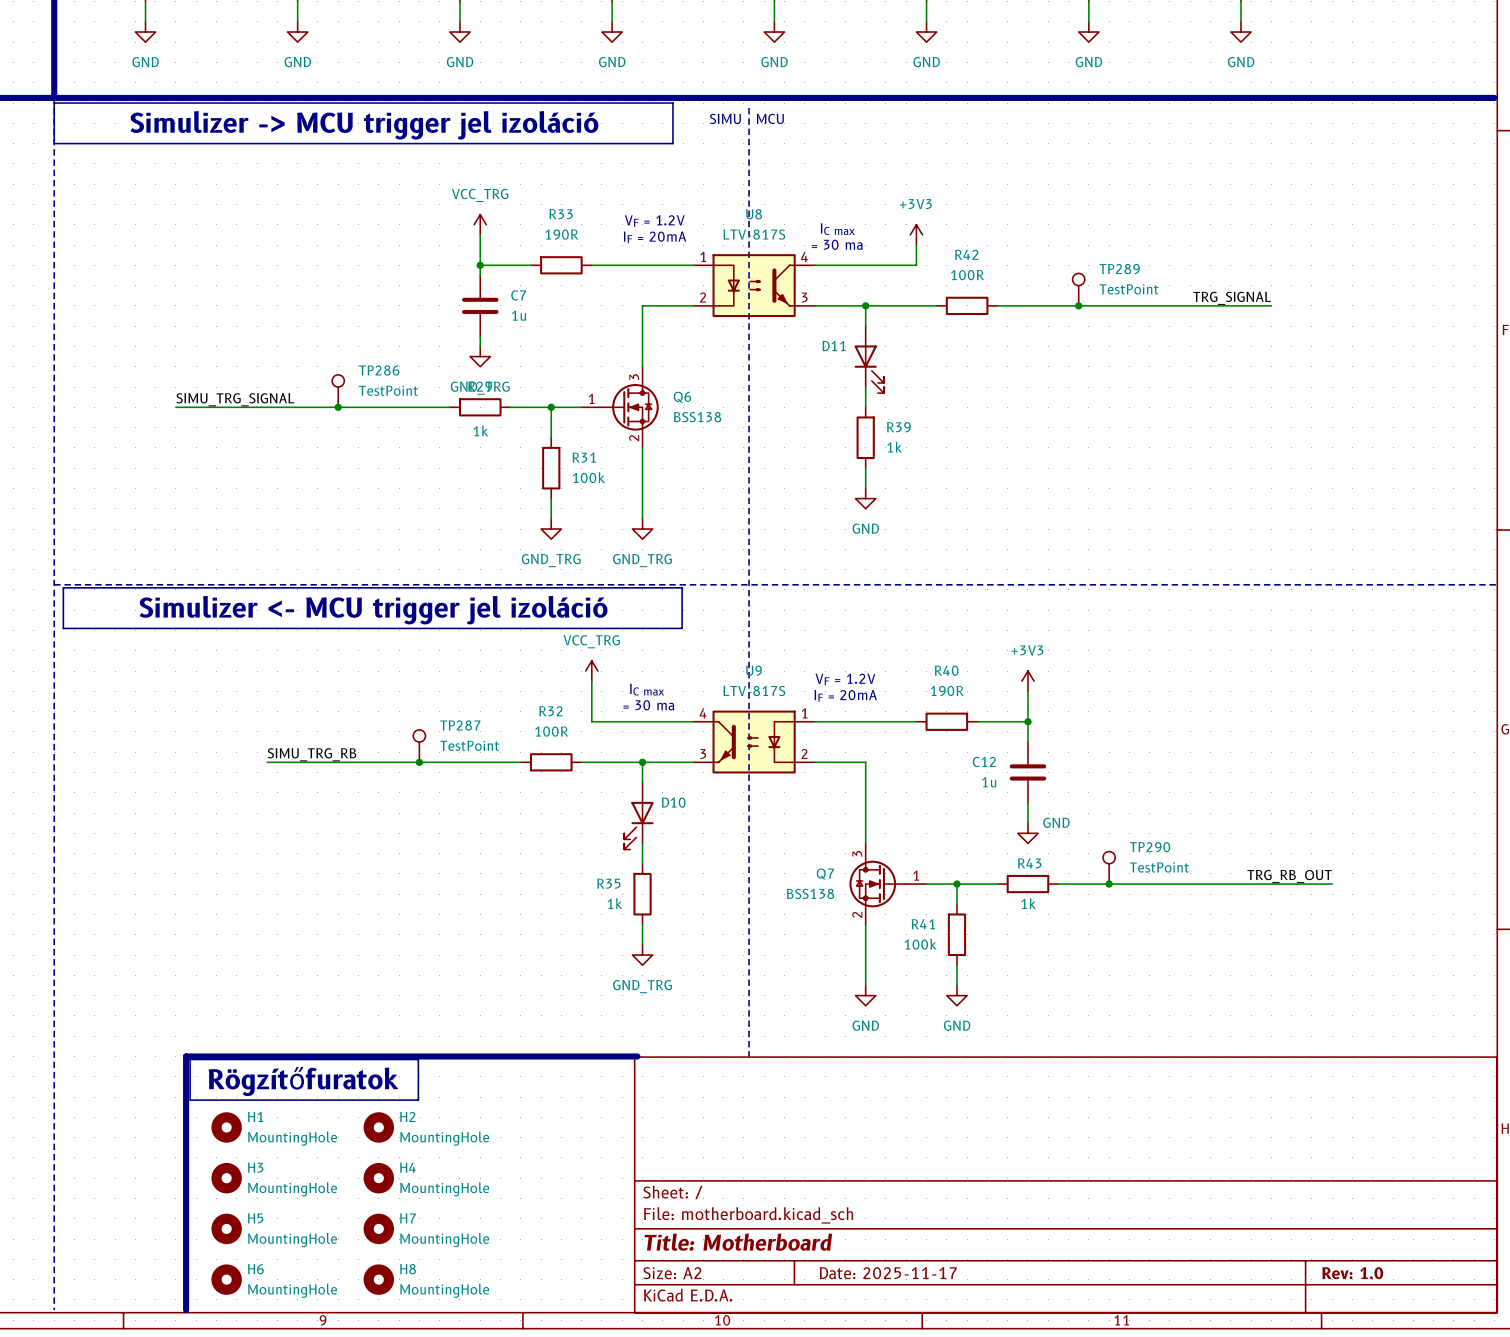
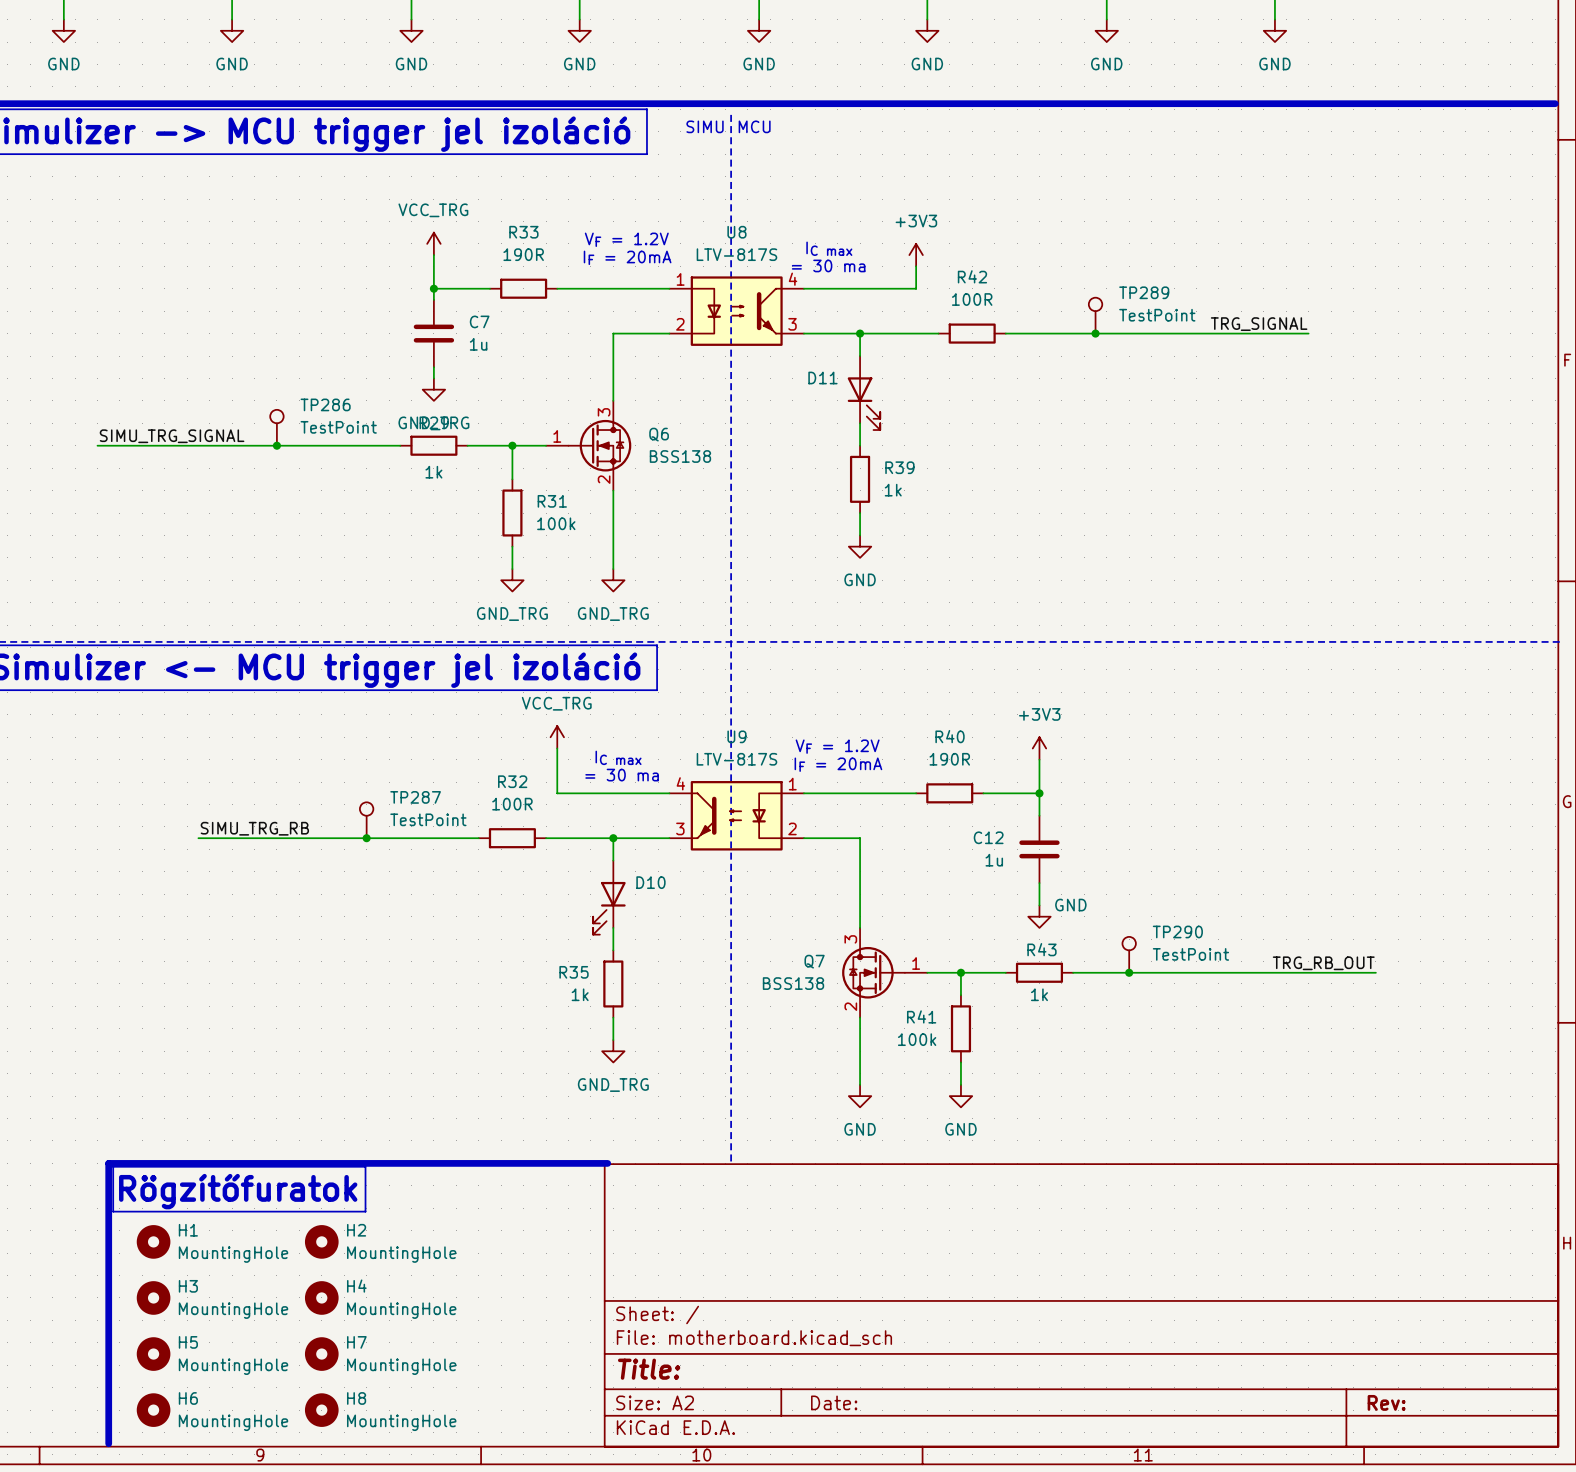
title block: Title: Motherboard (738, 1242) -> Title: (649, 1369)
title block: Date: 2025-11-17 (888, 1273) -> Date: (834, 1402)
title block: Rev: 1.0 (1352, 1273) -> Rev: (1386, 1402)

